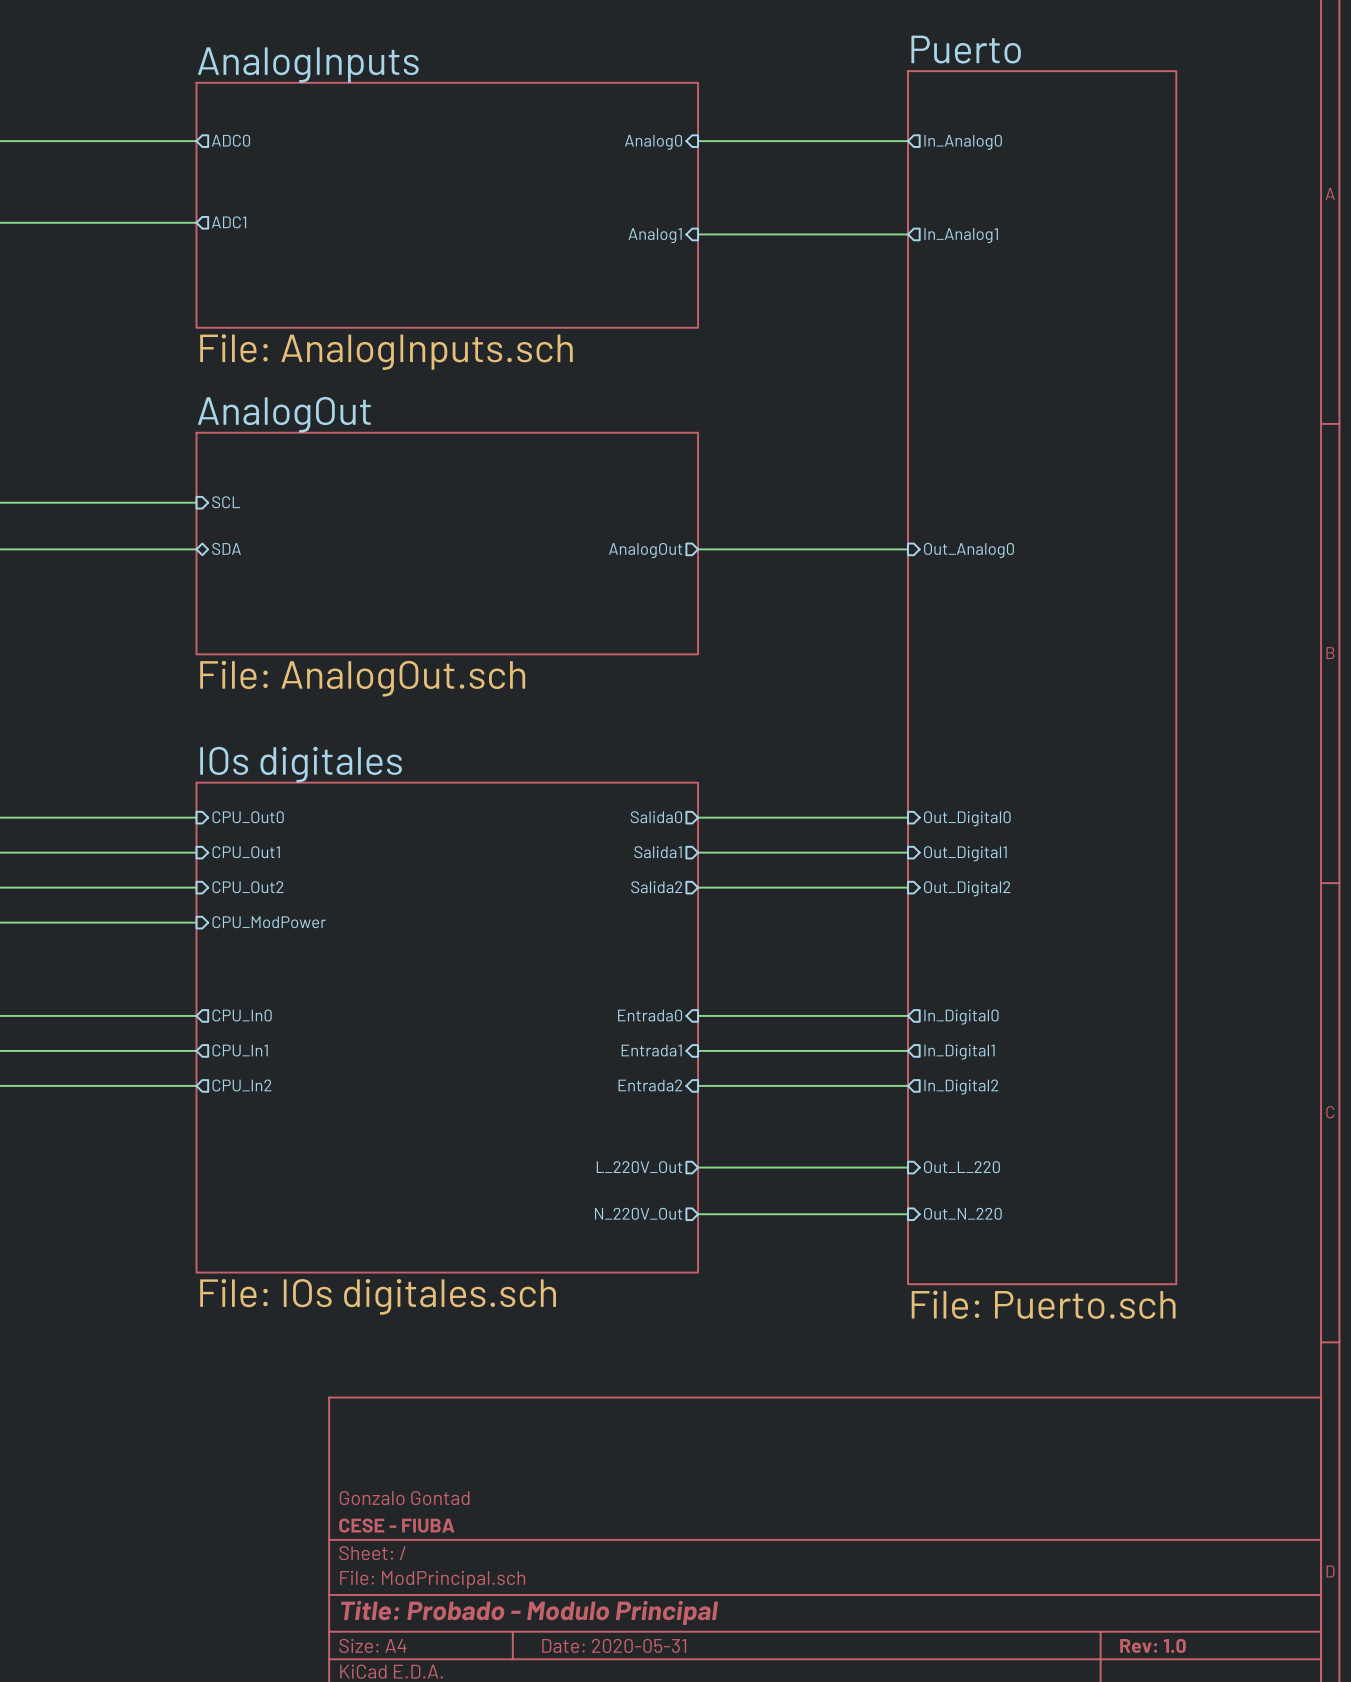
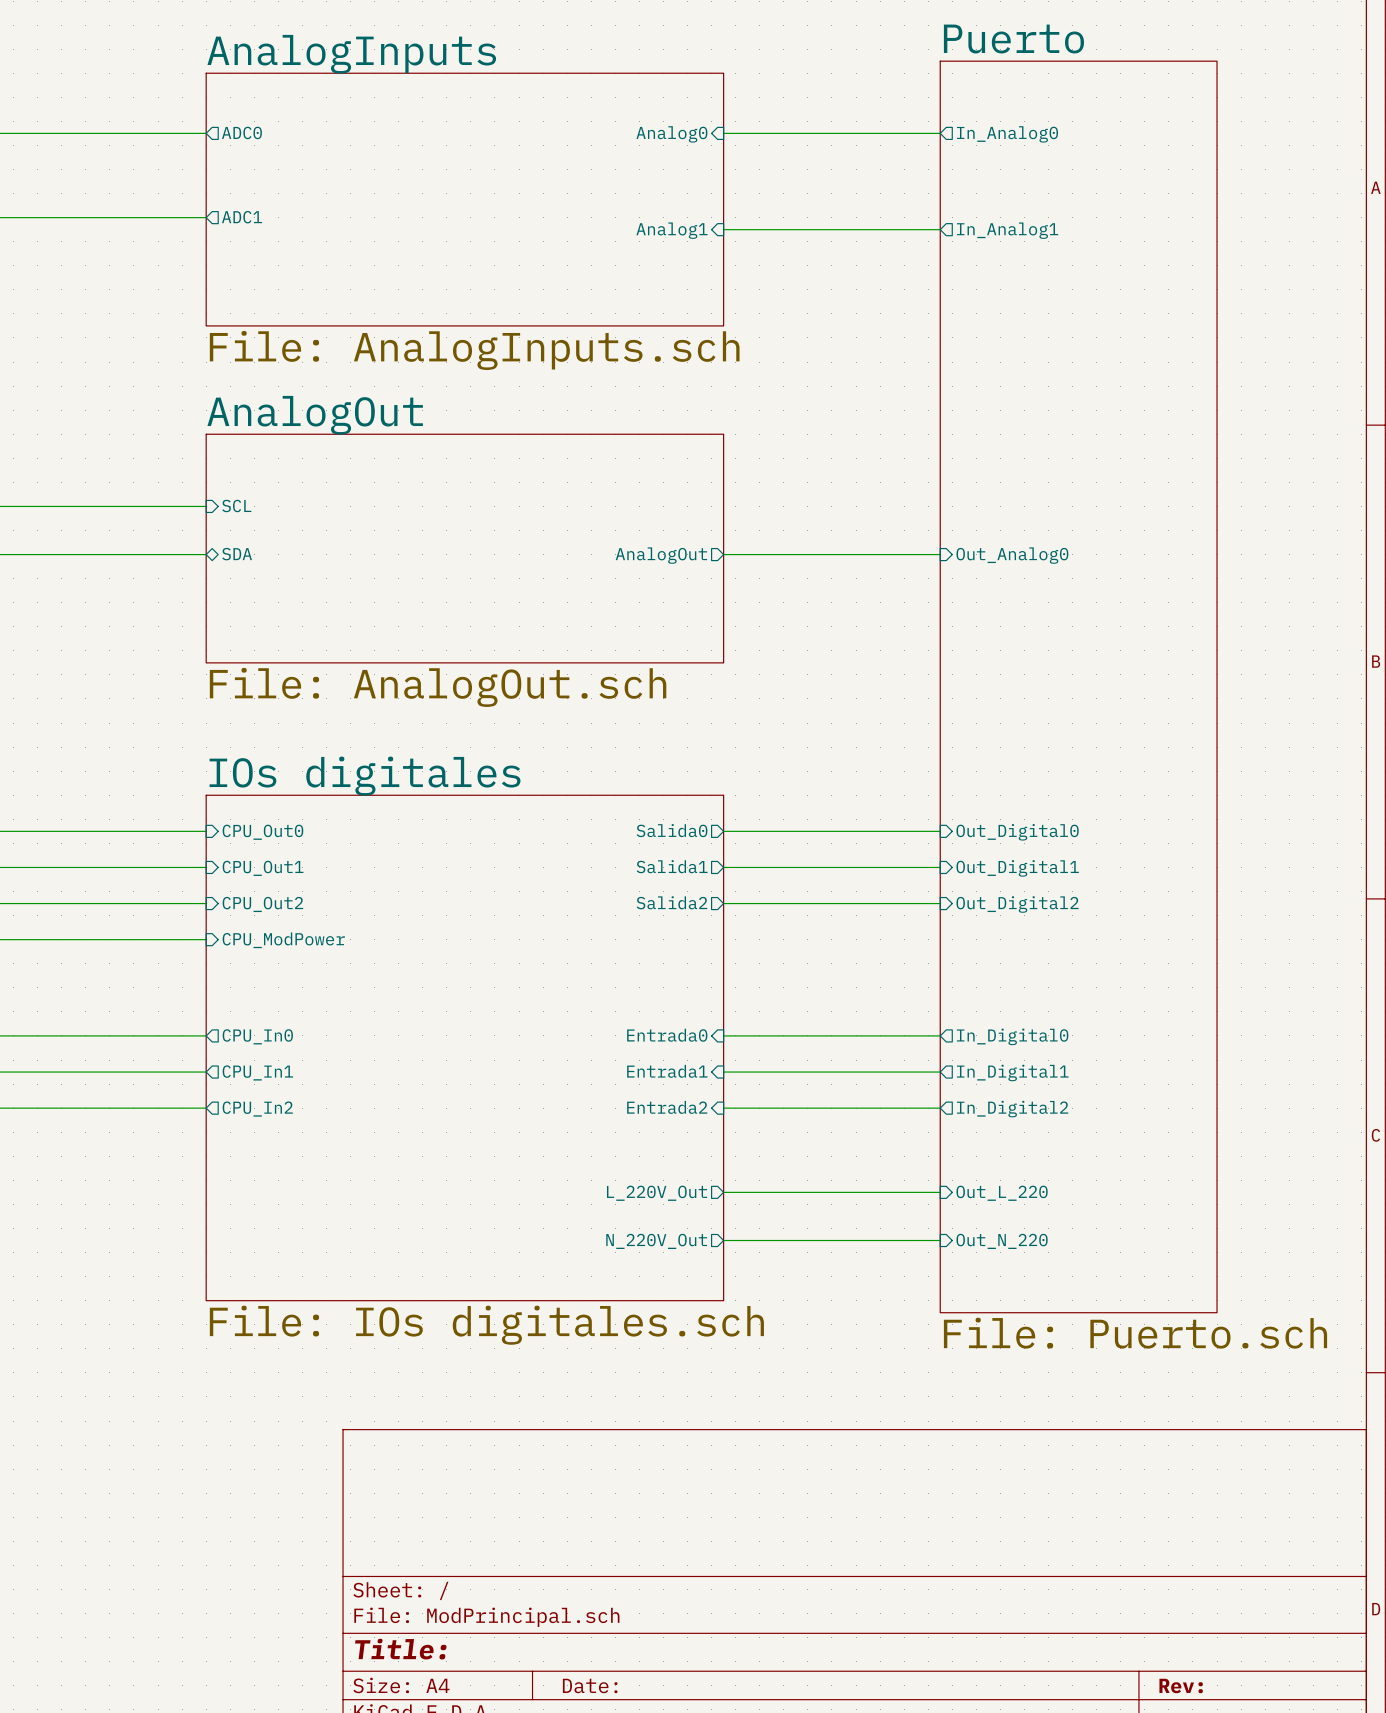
title block: Gonzalo Gontad (404, 1498) -> none
title block: CESE - FIUBA (396, 1525) -> none
title block: Title: Probado - Modulo Principal (529, 1612) -> Title: (400, 1649)
title block: Date: 2020-05-31 (614, 1645) -> Date: (590, 1685)
title block: Rev: 1.0 (1152, 1645) -> Rev: (1181, 1685)

